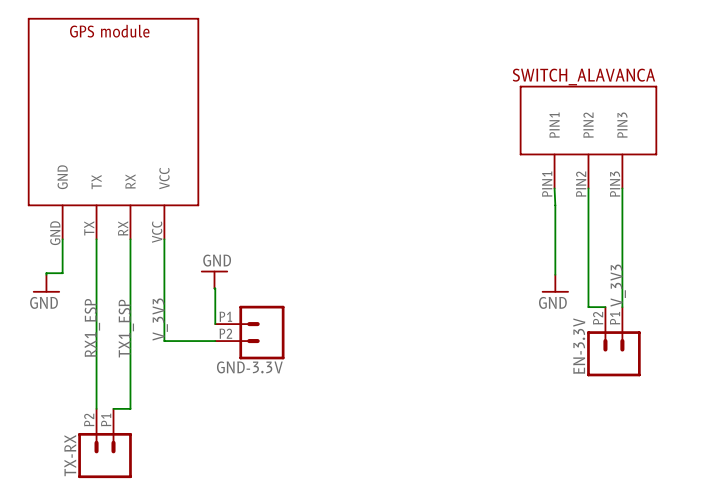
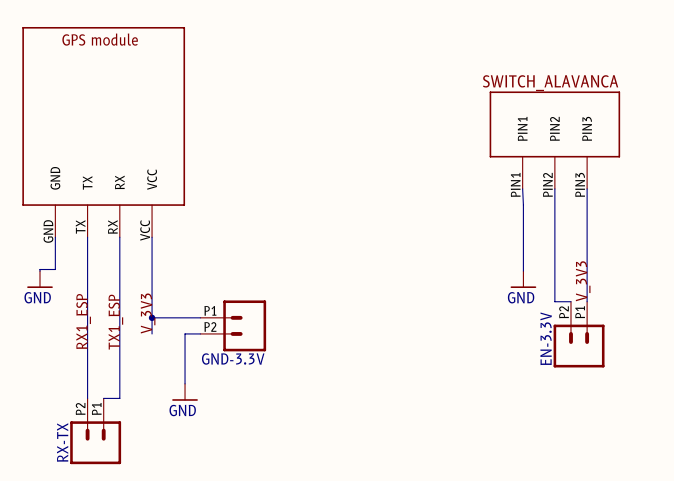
power symbol rotation: 0° (214, 271) -> 180° (185, 399)
power symbol position: GND (214, 279) -> GND (185, 392)
wire: (214, 288) (215, 324) -> (152, 317) (200, 317)
junction: none -> (152, 317)
wire: (164, 341) (199, 341) -> (185, 383) (185, 333)
TX-RX name: TX-RX (70, 455) -> RX-TX (62, 442)

